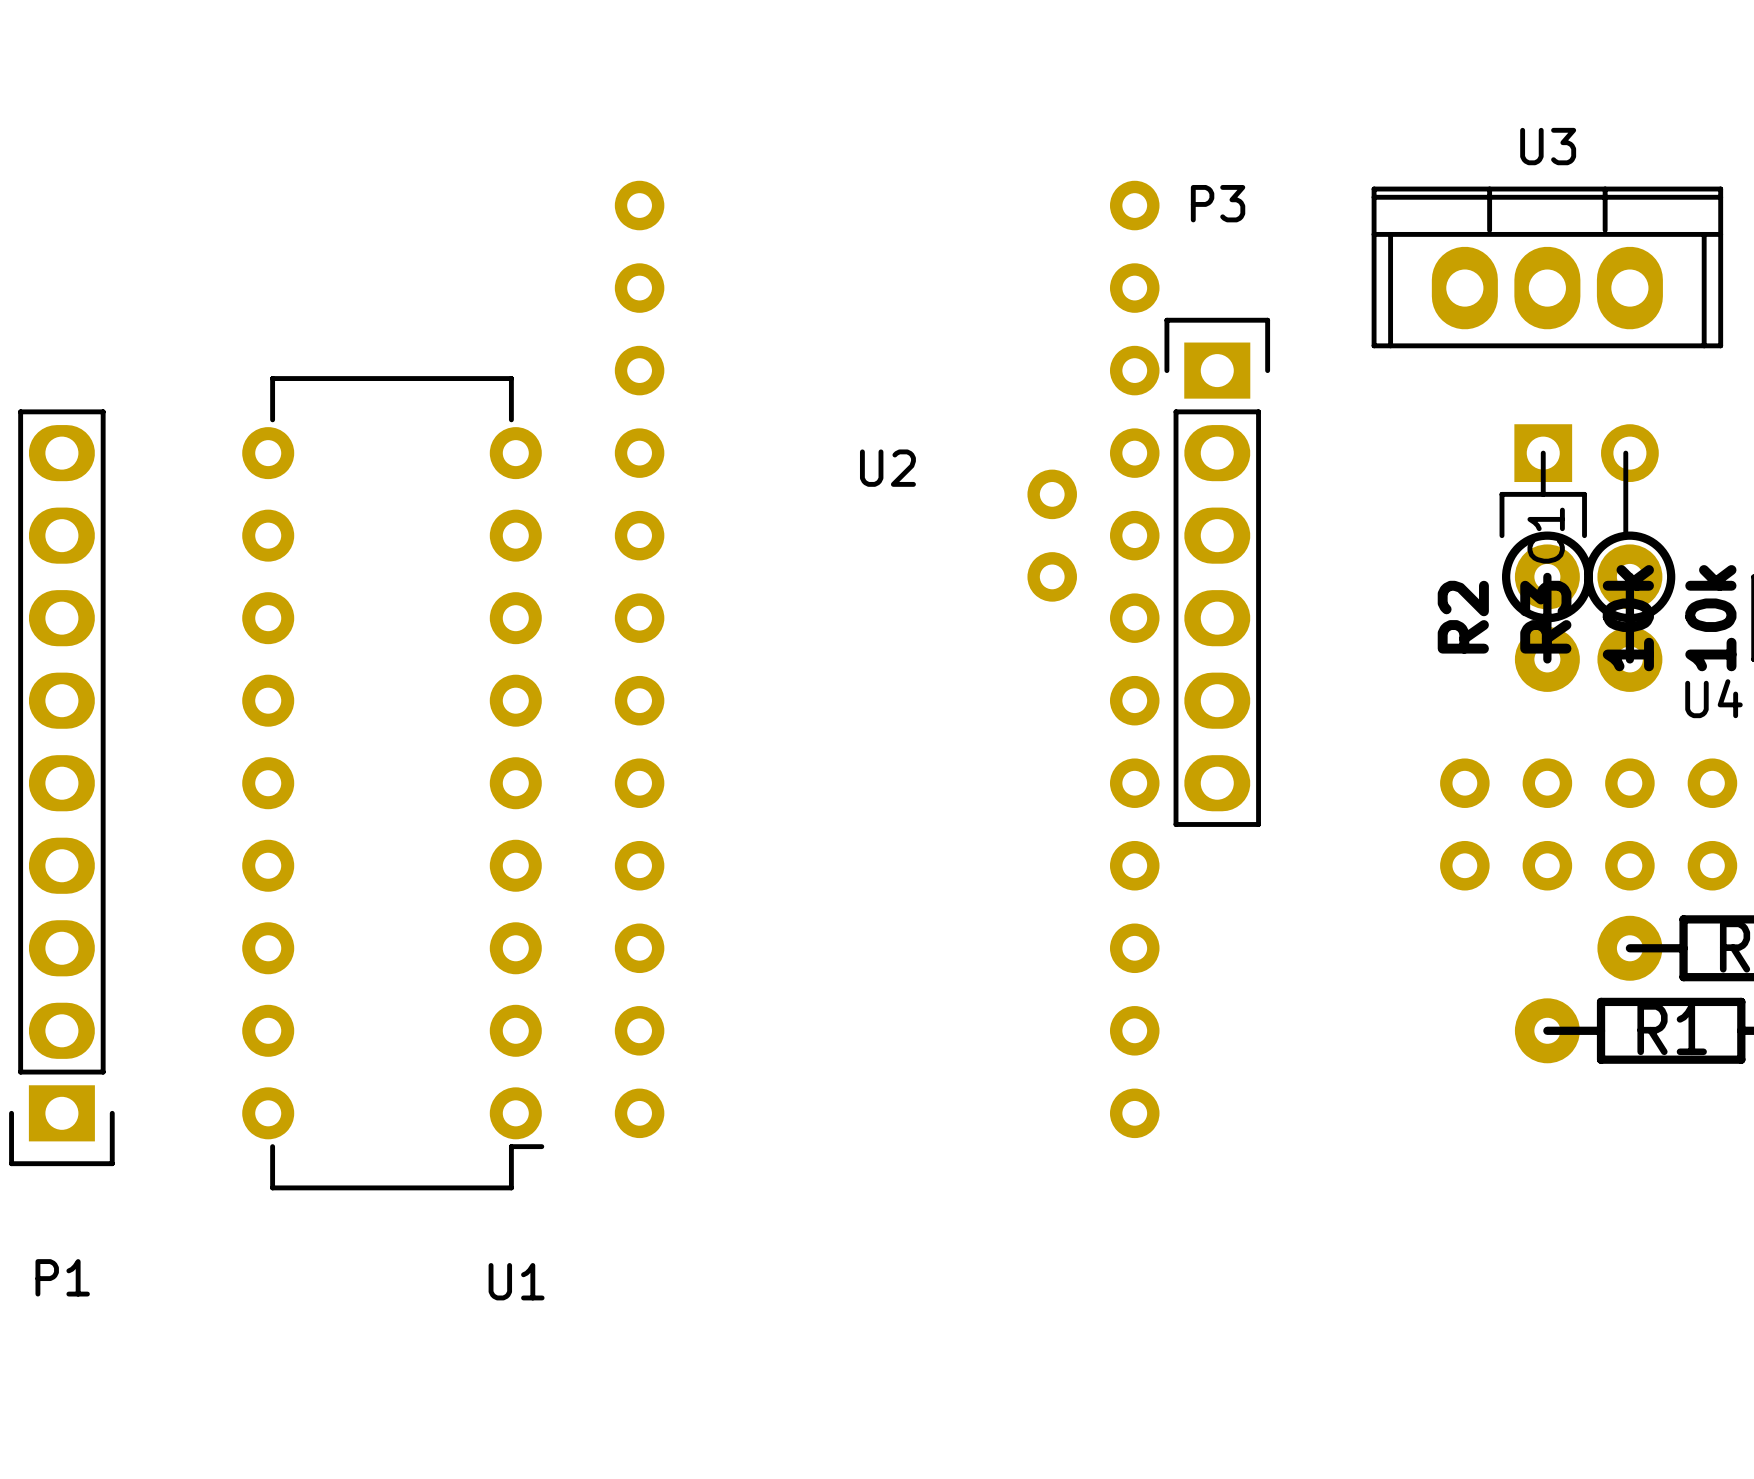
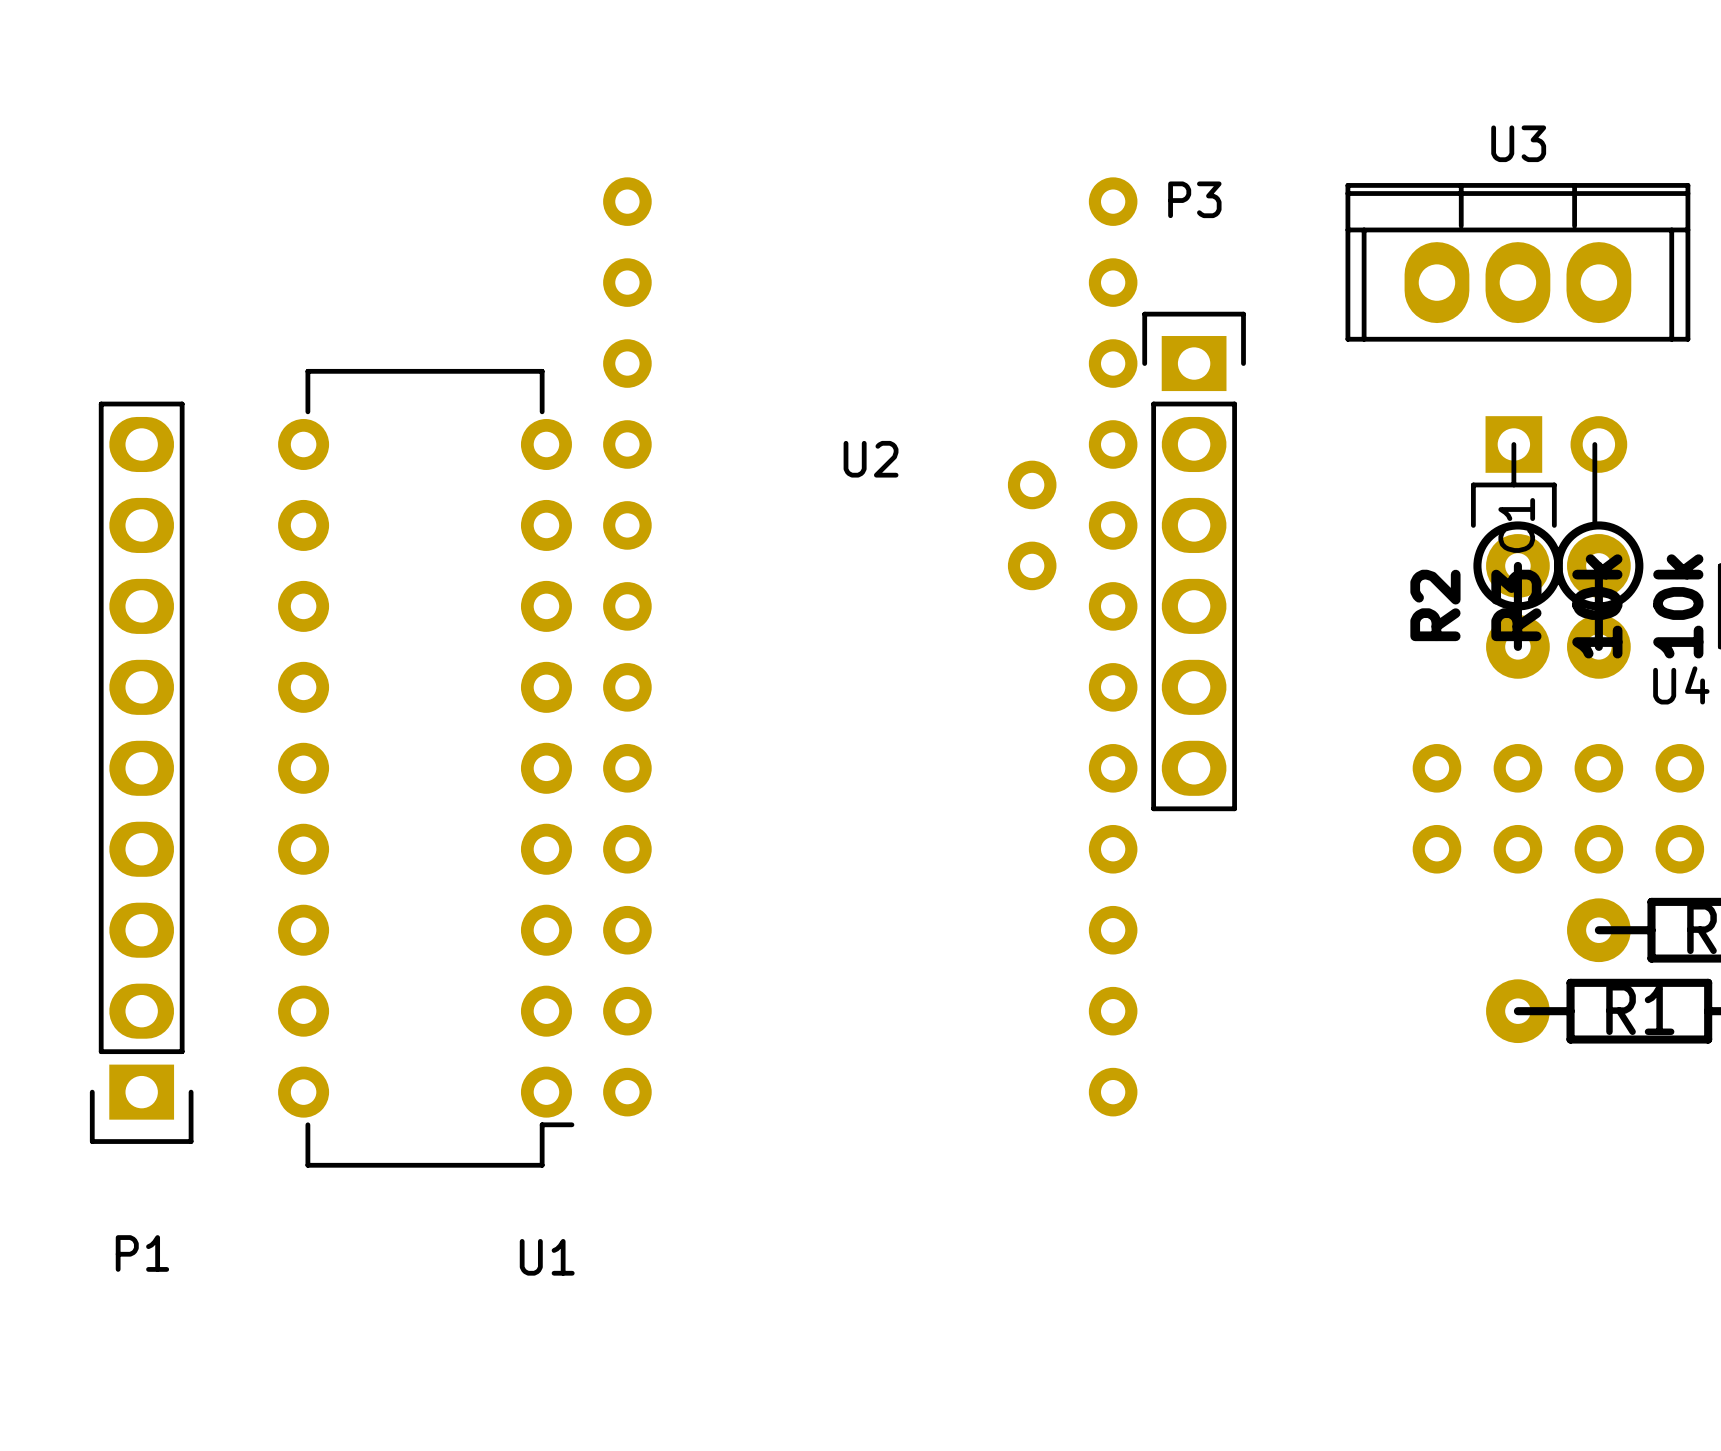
U1 position: (393, 783) -> (426, 768)
P1 position: (61, 787) -> (141, 772)

